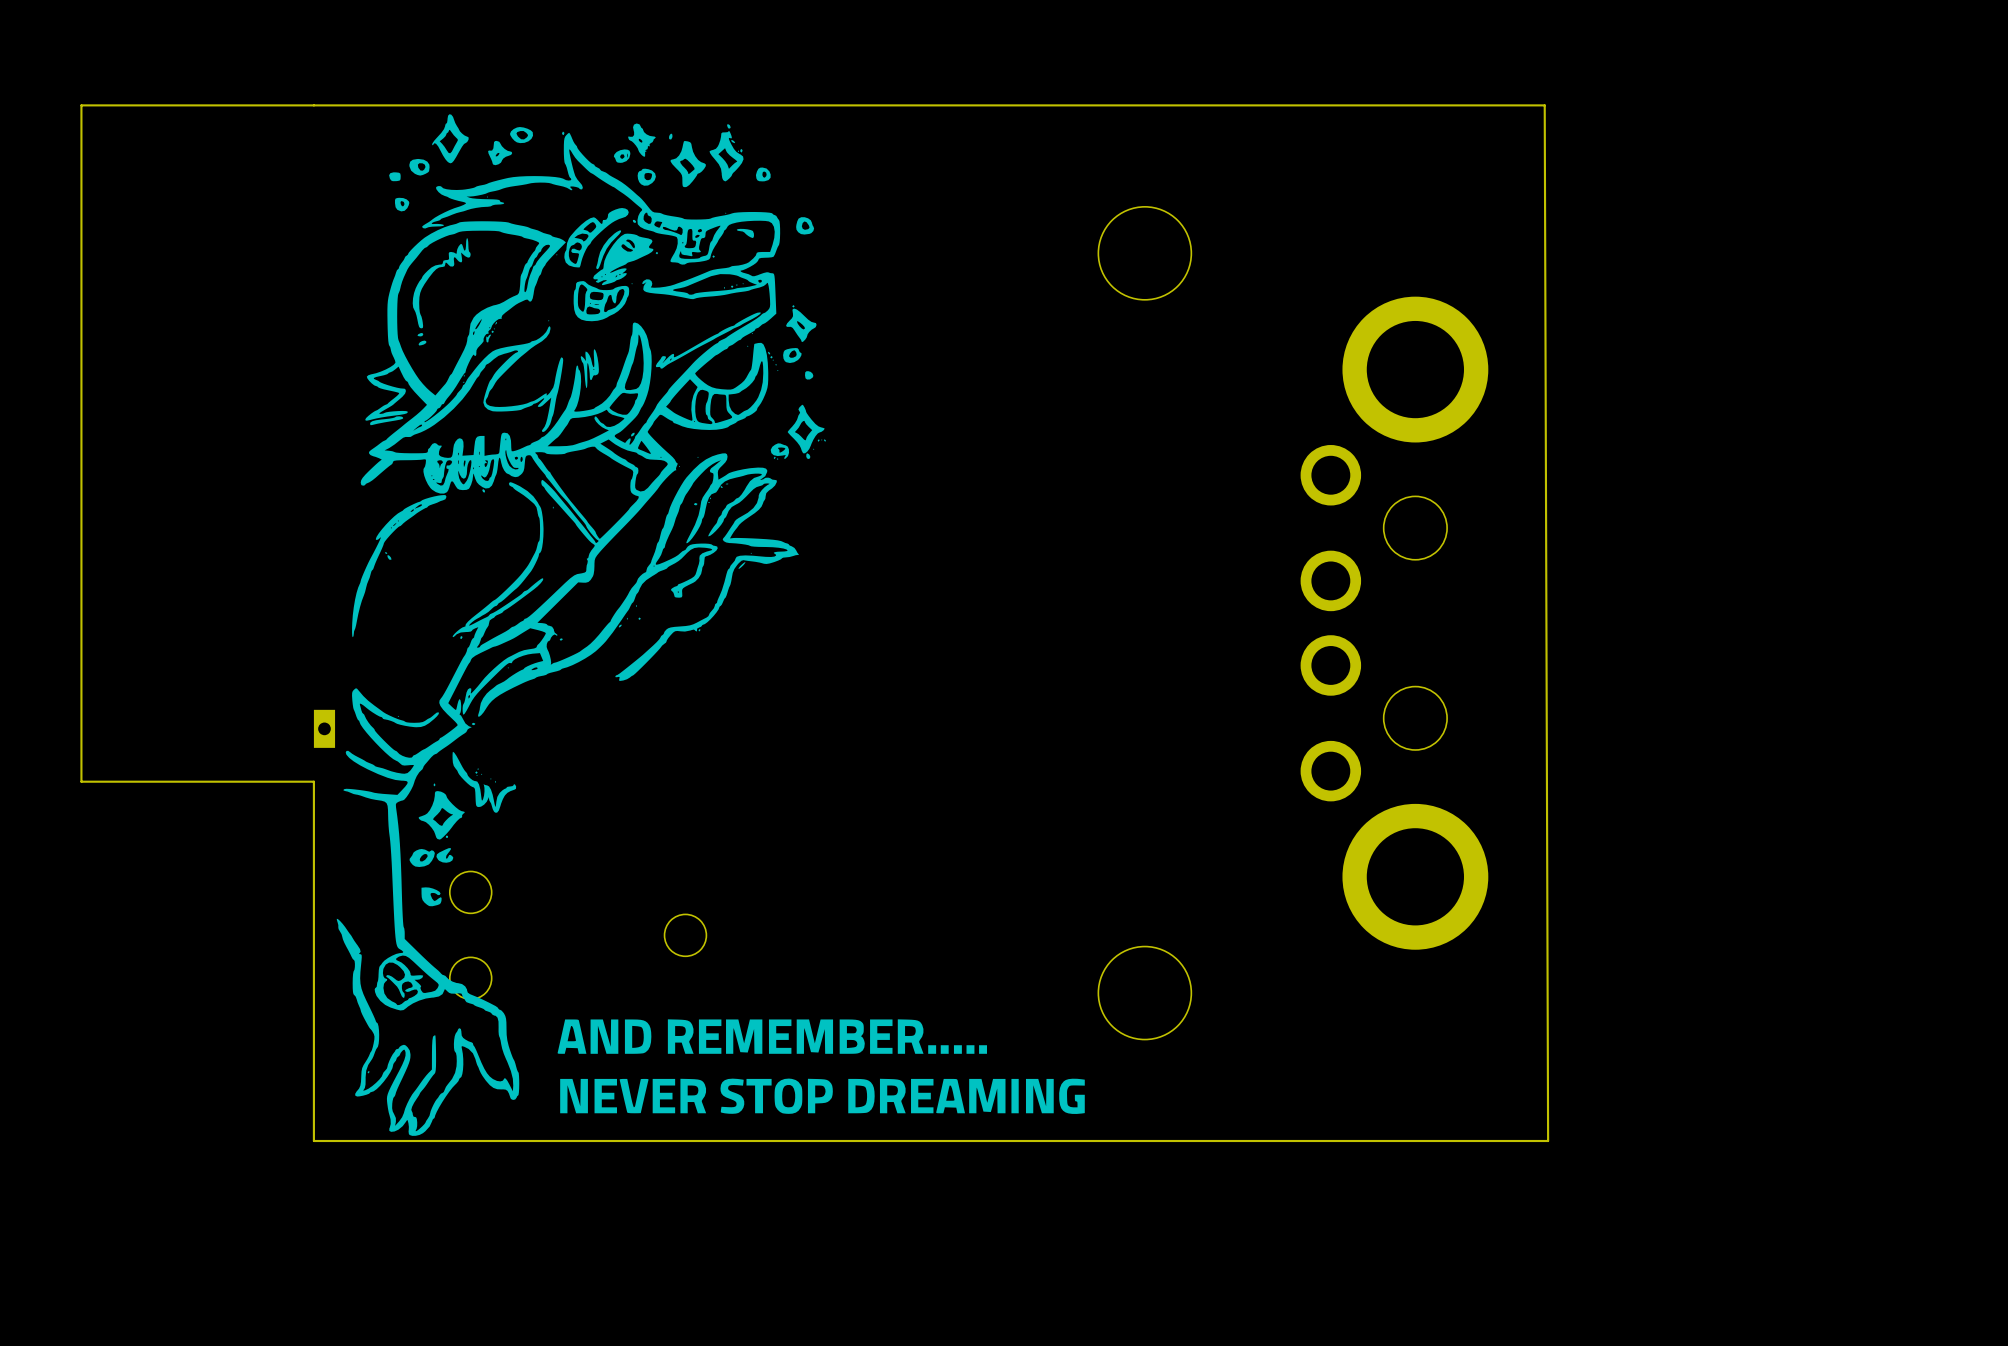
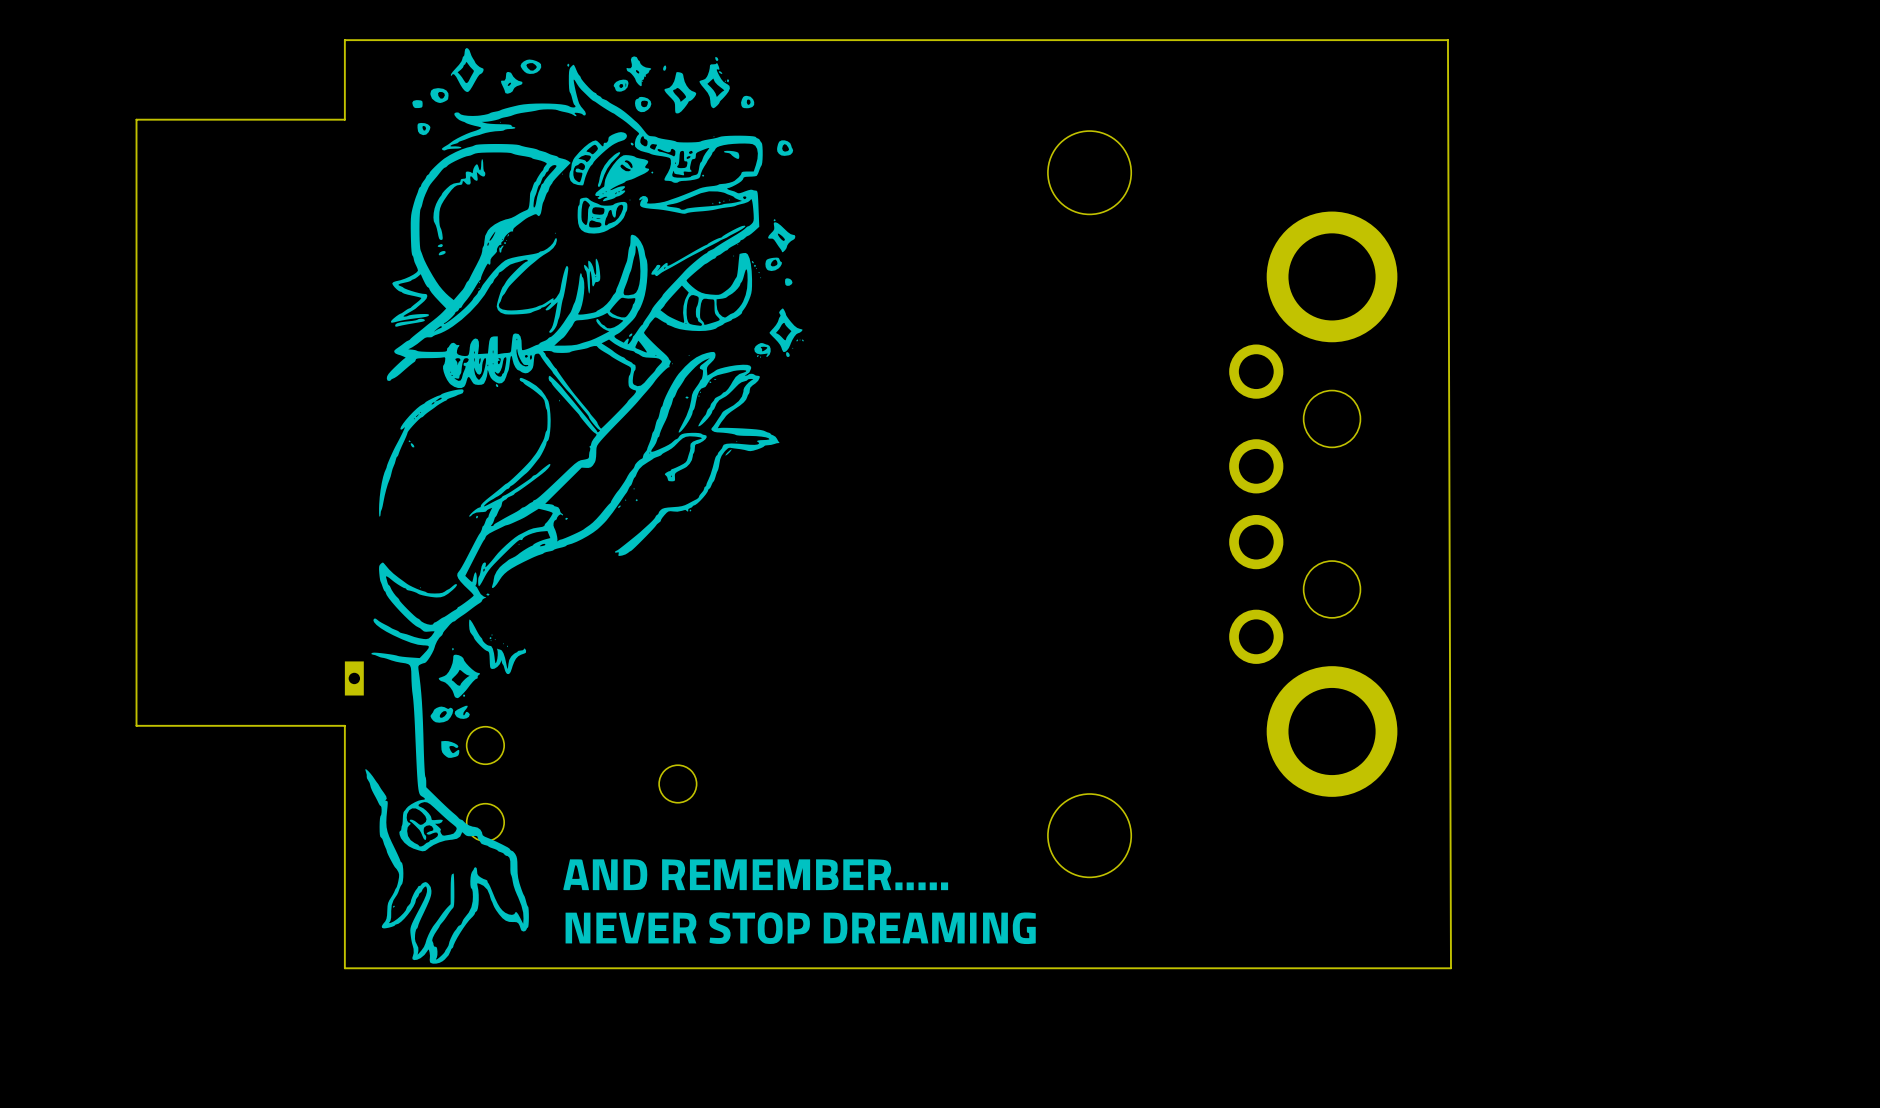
board edge: (313, 105) (81, 105) (81, 194) -> (344, 40) (344, 119) (136, 119)
part position: (324, 728) -> (354, 678)
board edge: (81, 781) (313, 781) (313, 870) -> (136, 646) (136, 725) (344, 725)

